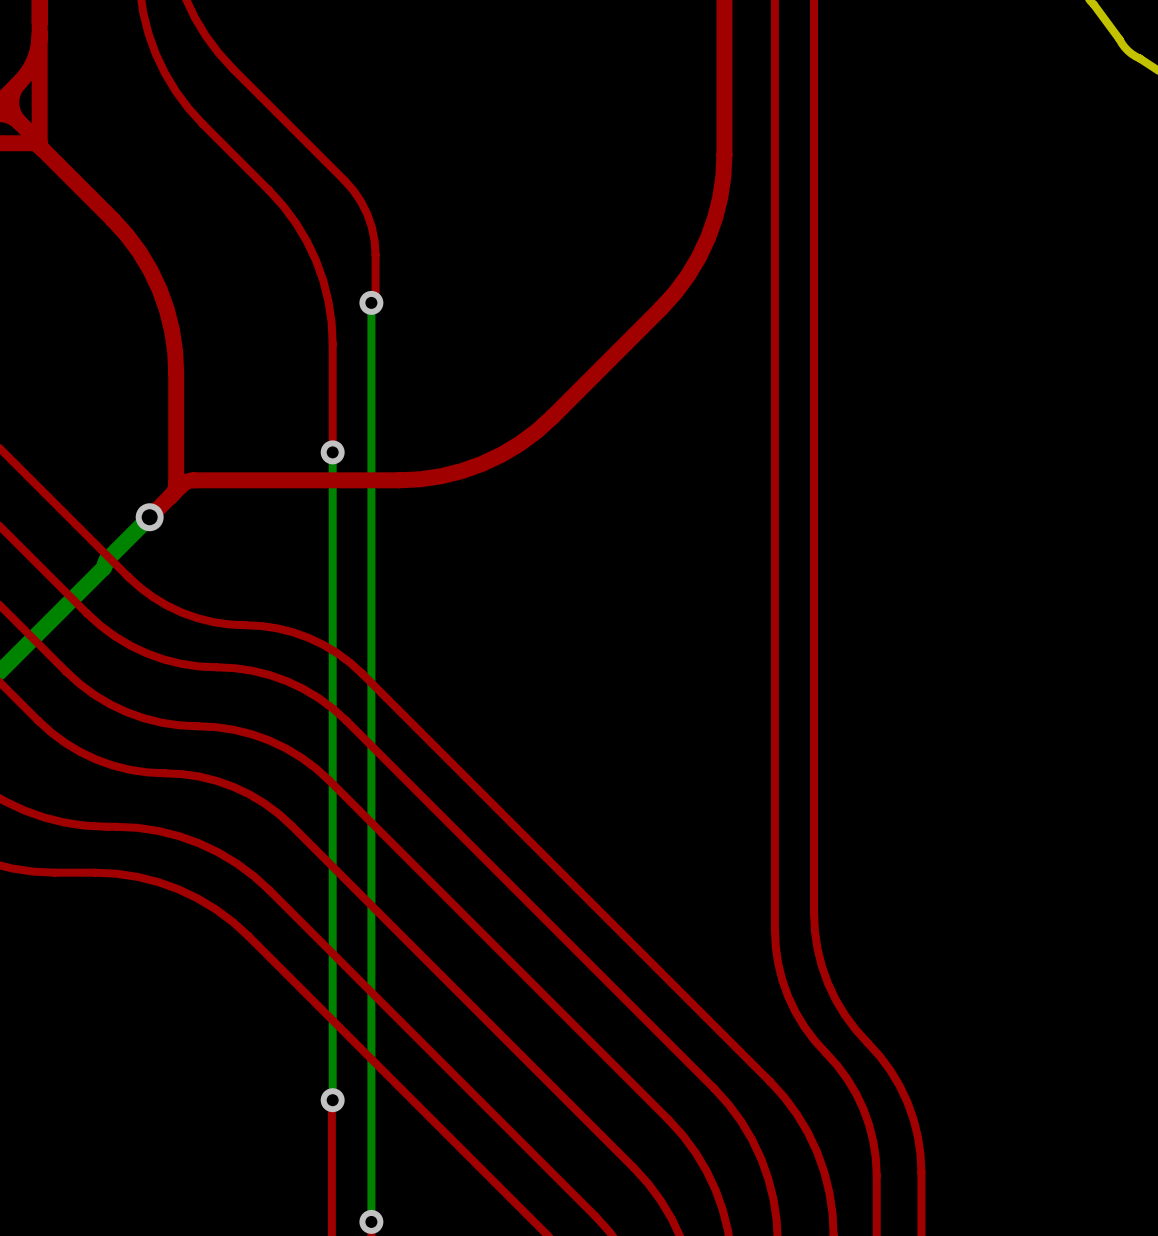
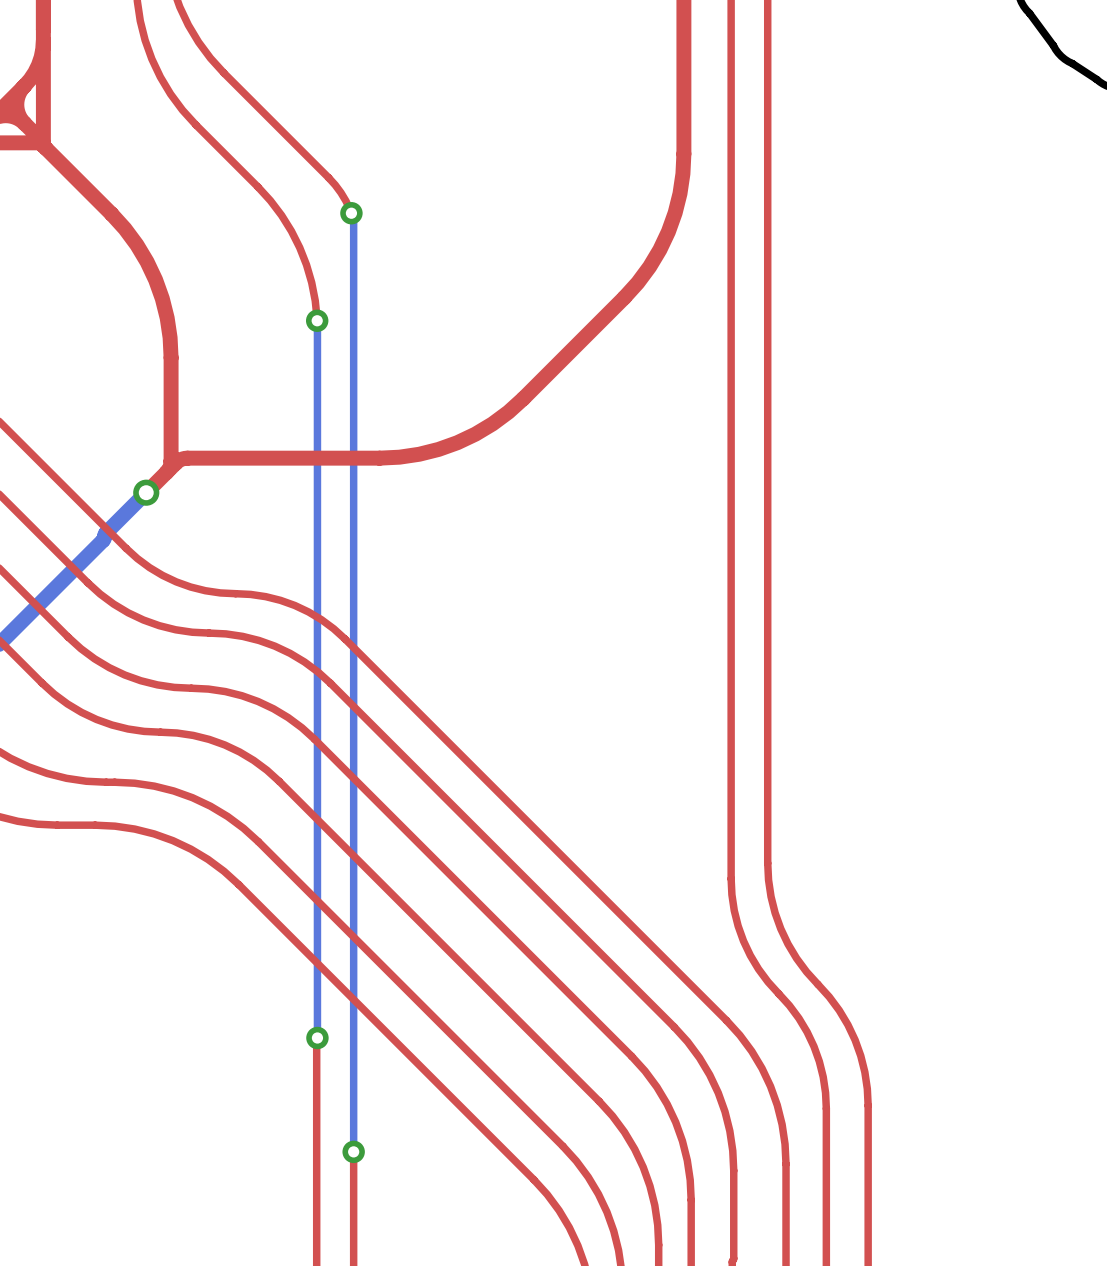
top track: (344, 180) (361, 202) (372, 227) (375, 255) (375, 295) (371, 302) -> (328, 177) (340, 192) (351, 213)
top track: (269, 190) (283, 206) (307, 241) (316, 260) (328, 301) (332, 343) (332, 452) -> (257, 186) (281, 215) (299, 247) (311, 282) (317, 320)
bottom track: none -> (351, 213) (353, 215) (353, 292)
via: none -> (351, 213)
via: (371, 302) -> none
bottom track: none -> (317, 321) (317, 432)
via: none -> (317, 320)
via: (332, 452) -> none

